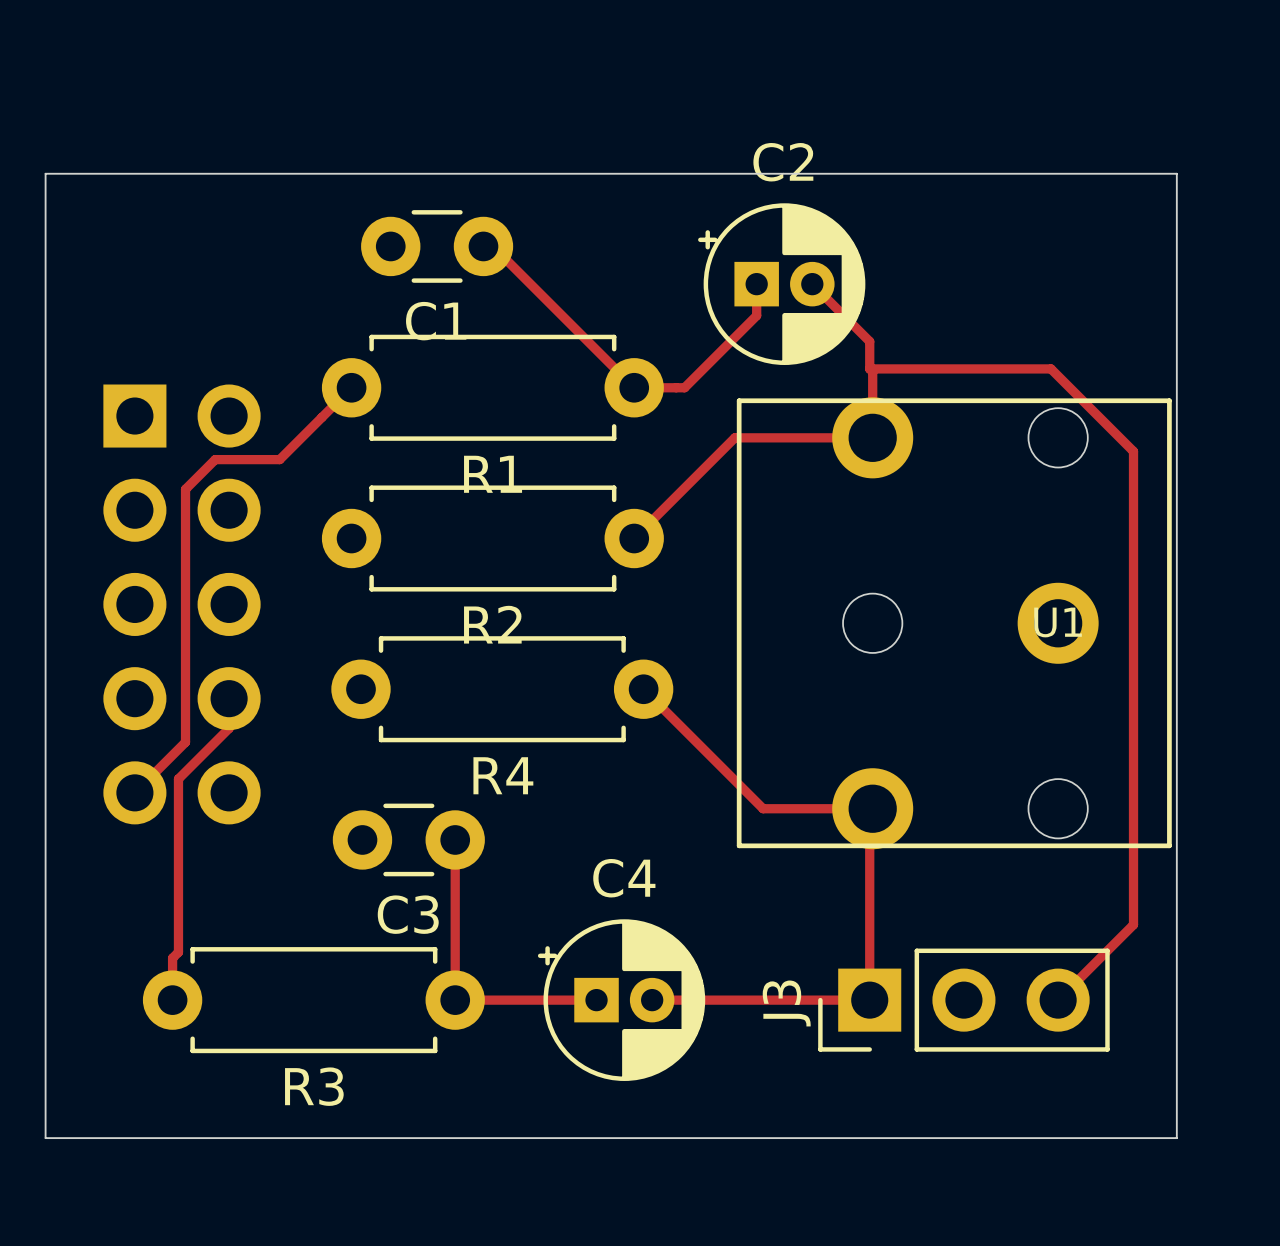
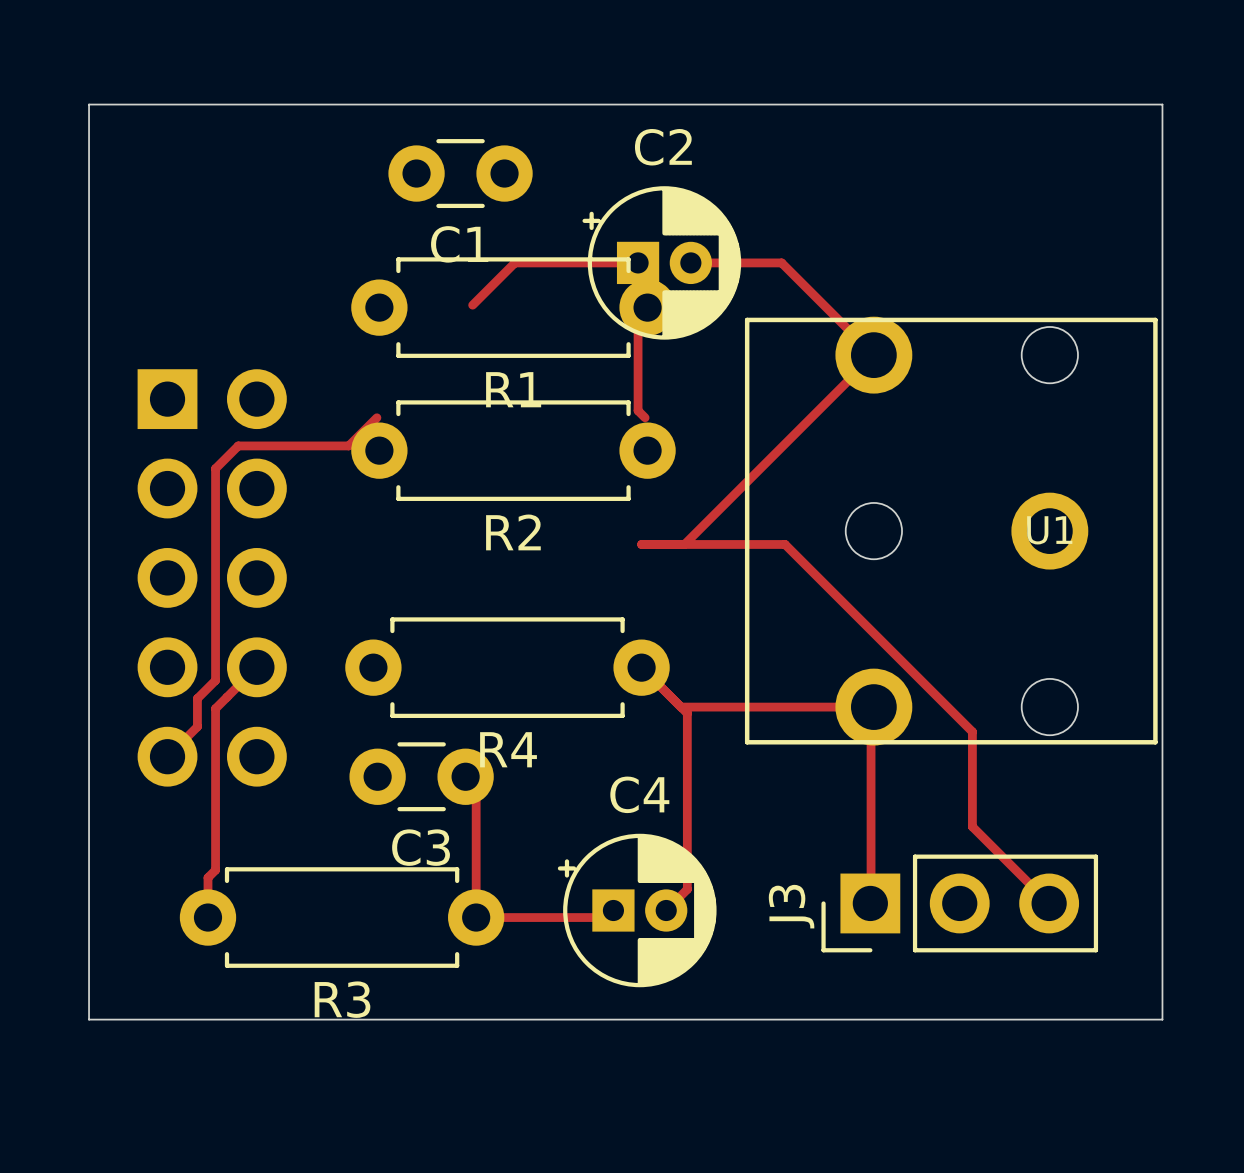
track: (483, 246) (492, 246) (634, 387) (684, 387) (756, 315) (756, 284) -> none
C2 position: (781, 284) -> (661, 262)
track: (812, 284) (869, 341) (869, 368) -> none
track: none -> (690, 262) (781, 262) (873, 355) (684, 544)
track: (869, 368) (1050, 368) (1133, 451) (1133, 924) (1058, 1000) -> none
track: (869, 368) (872, 371) (872, 437) (734, 437) (634, 538) -> none
track: none -> (472, 305) (514, 262) (638, 262) (638, 410) (645, 417)
track: (351, 387) (279, 459) (215, 459) (185, 489) (185, 742) (134, 792) -> none
track: none -> (376, 417) (348, 445) (238, 445) (215, 468) (215, 680) (197, 698) (197, 726) (167, 756)
part position: (182, 604) -> (212, 577)
track: none -> (641, 544) (785, 544) (972, 731) (972, 826) (1049, 903)
R4 position: (502, 689) -> (507, 667)
track: (643, 689) (763, 808) -> (681, 707) (769, 707)
track: (229, 698) (229, 728) (178, 778) (178, 952) (172, 958) (172, 1000) -> none
track: none -> (256, 667) (215, 708) (215, 870) (207, 877) (207, 917)
track: none -> (641, 667) (687, 713) (687, 889) (666, 910)
C3 position: (408, 839) -> (421, 776)
track: (455, 839) (455, 1000) (596, 1000) -> none
track: none -> (465, 776) (476, 787) (476, 917) (606, 917) (613, 910)
R3 position: (313, 1000) -> (342, 917)
C4 position: (621, 1000) -> (637, 910)
track: (652, 1000) (869, 1000) -> none
J3 position: (963, 1000) -> (959, 903)

